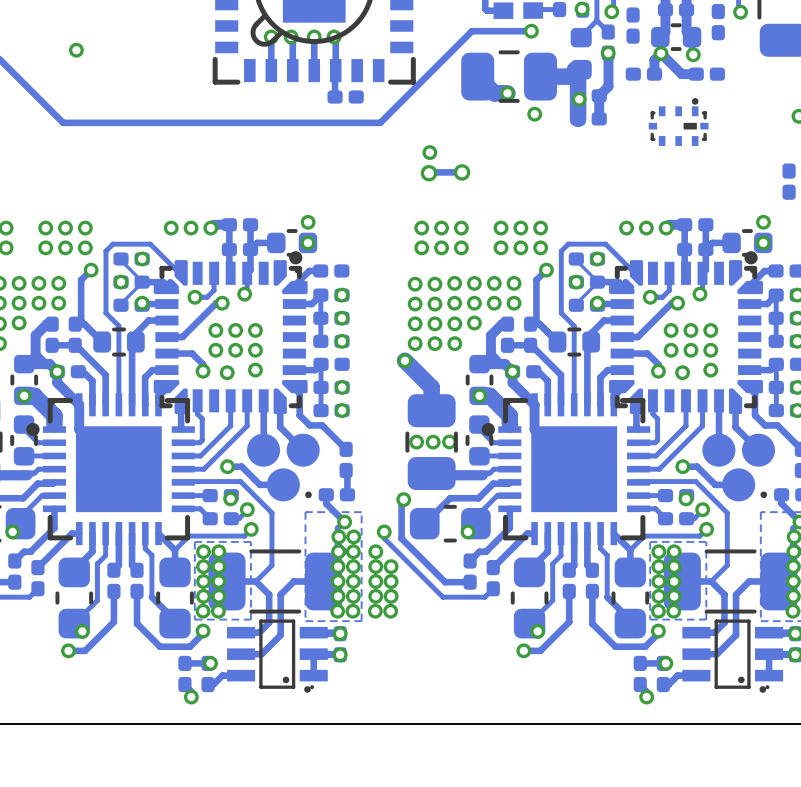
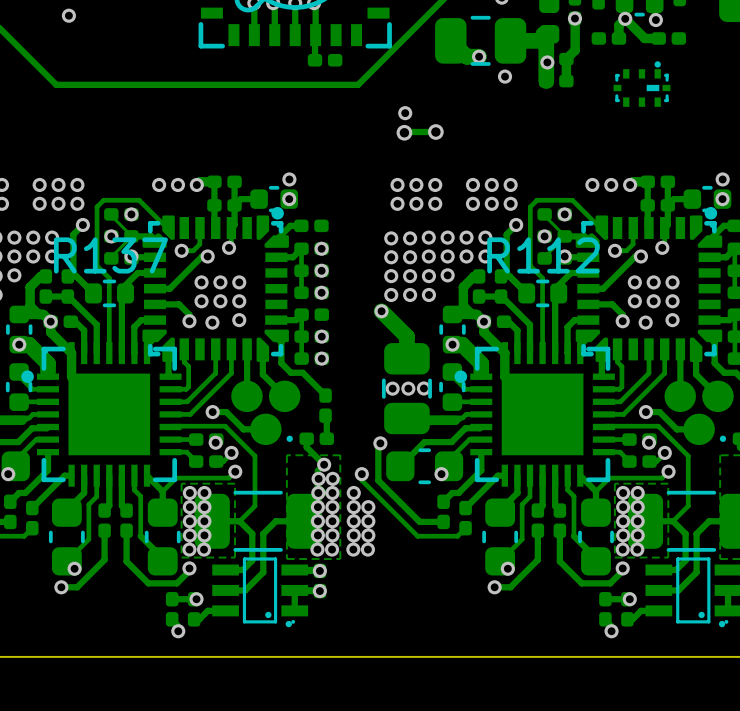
R112 name: none -> R112 (543, 255)
R137 name: none -> R137 (110, 255)

